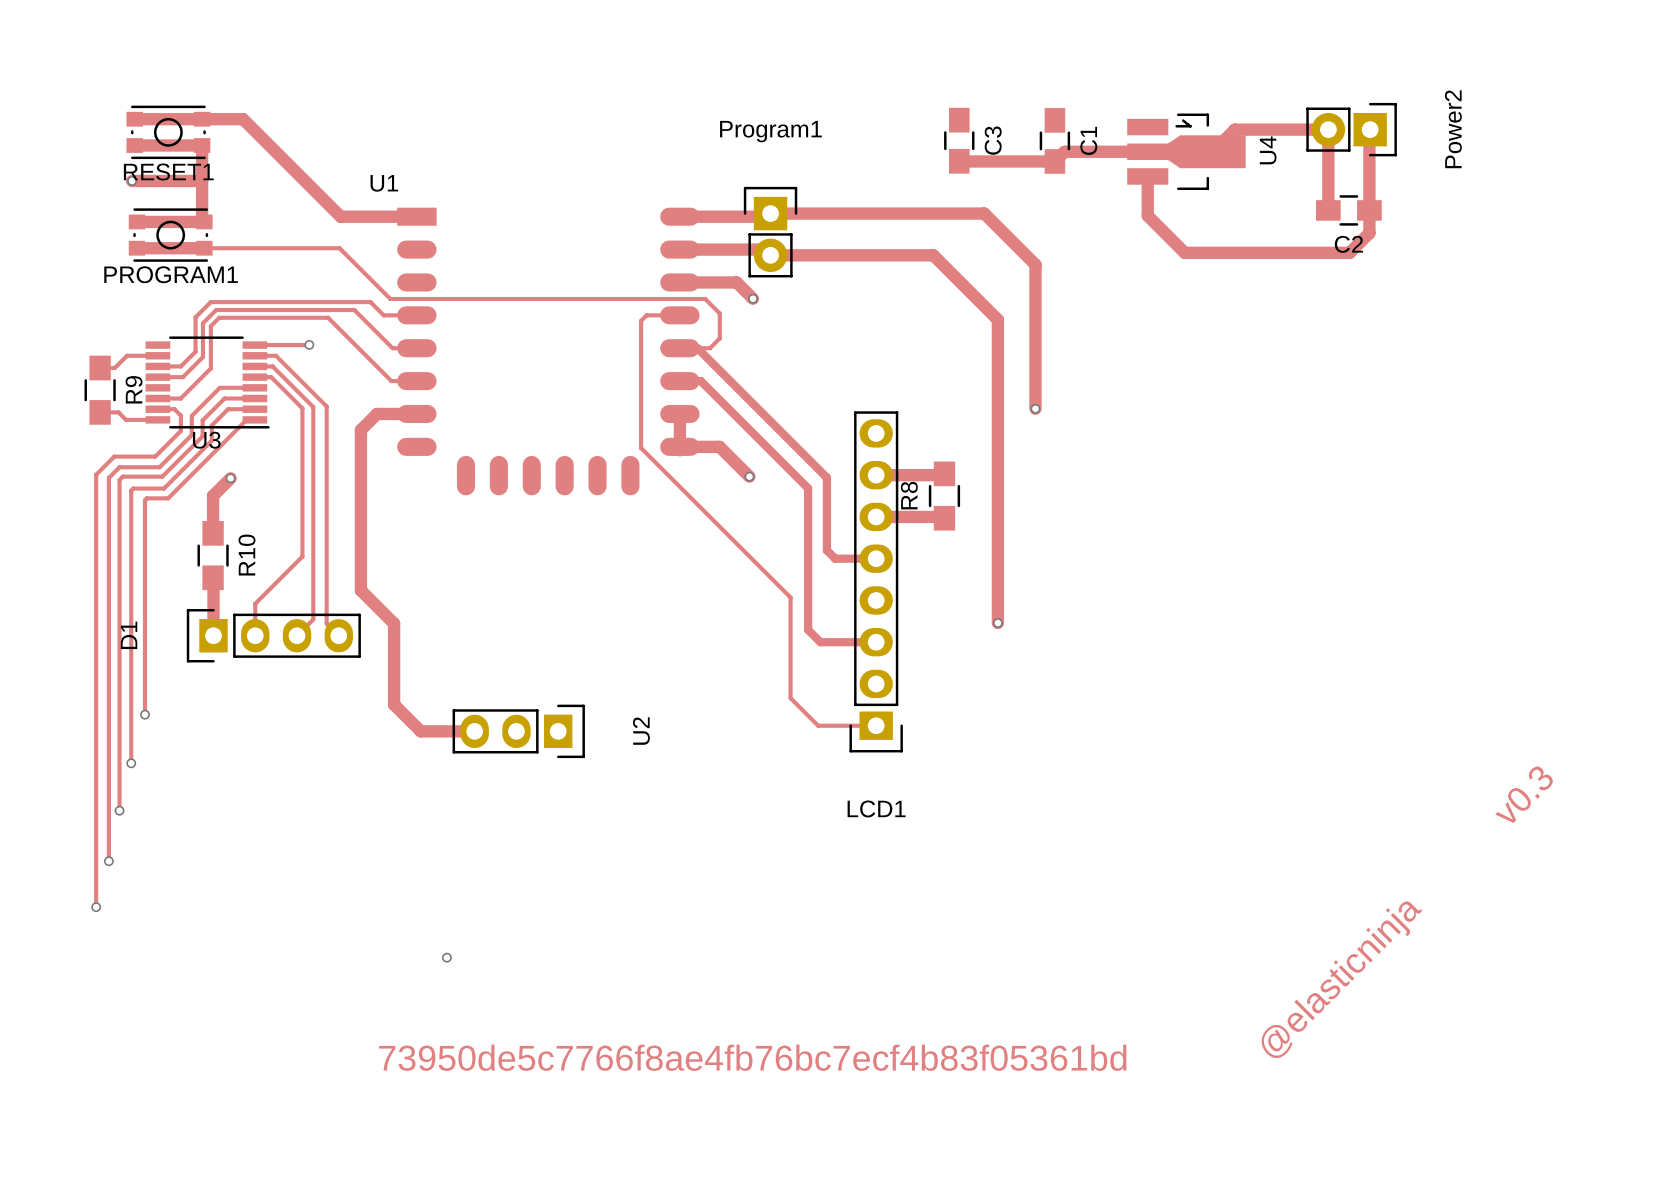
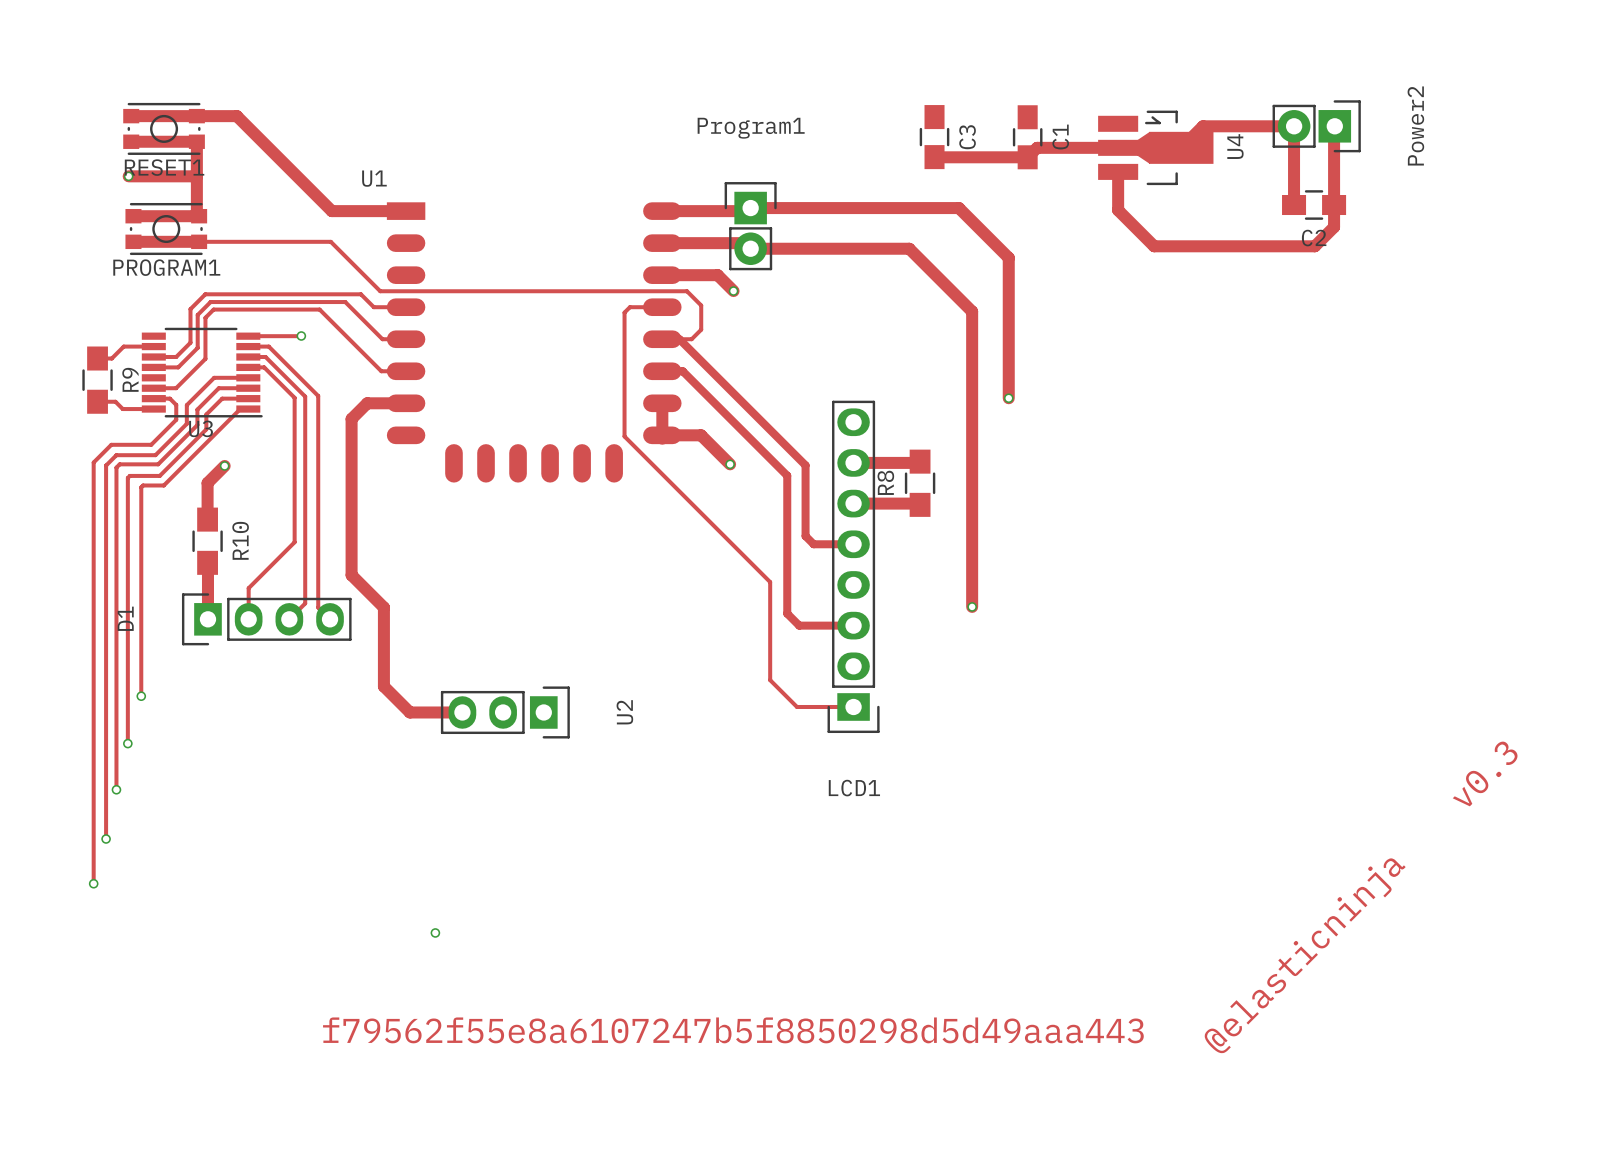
text: 73950de5c7766f8ae4fb76bc7ecf4b83f05361bd (752, 1057) -> f79562f55e8a6107247b5f8850298d5d49aaa443 (733, 1030)

